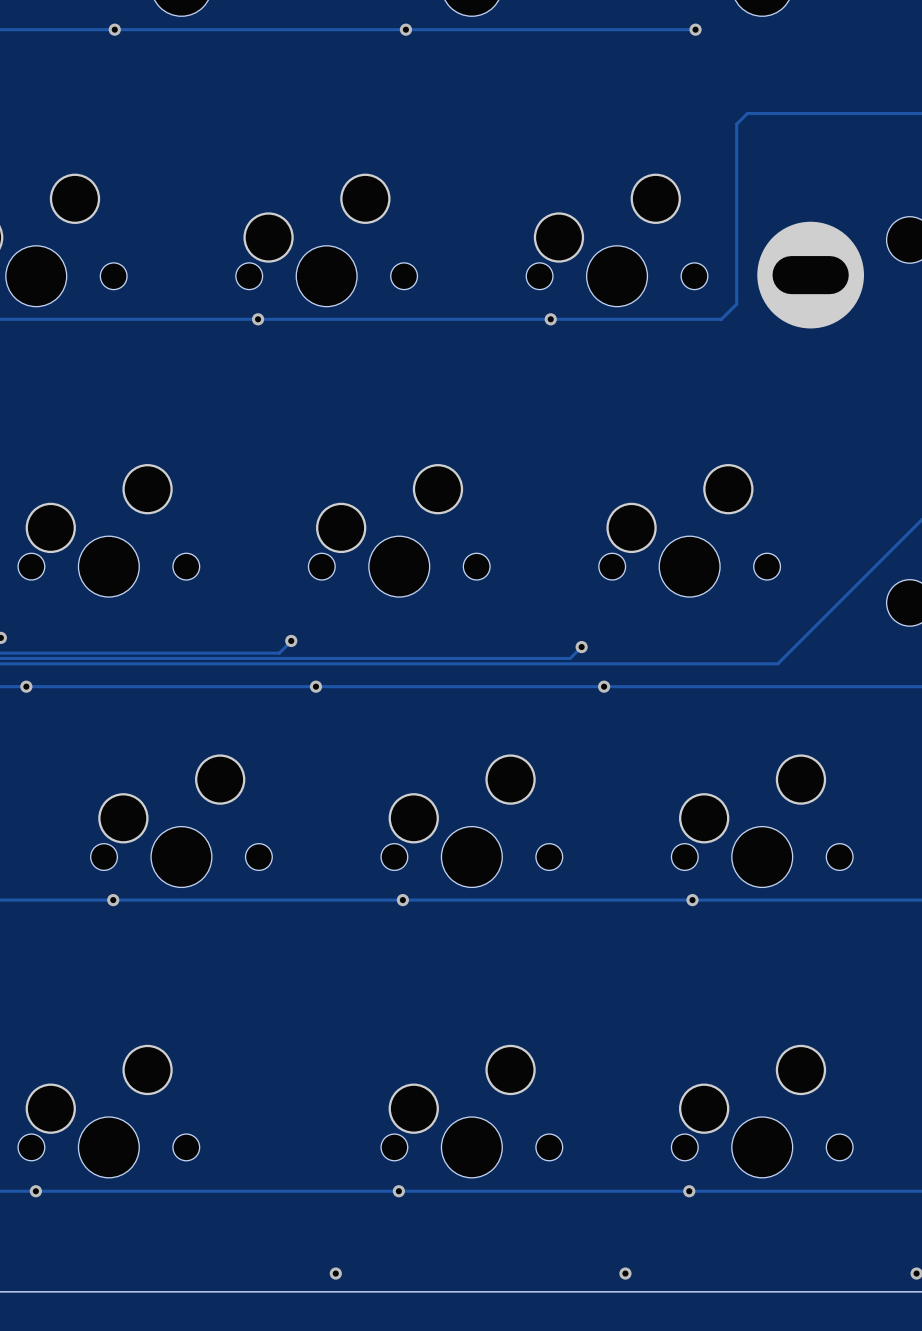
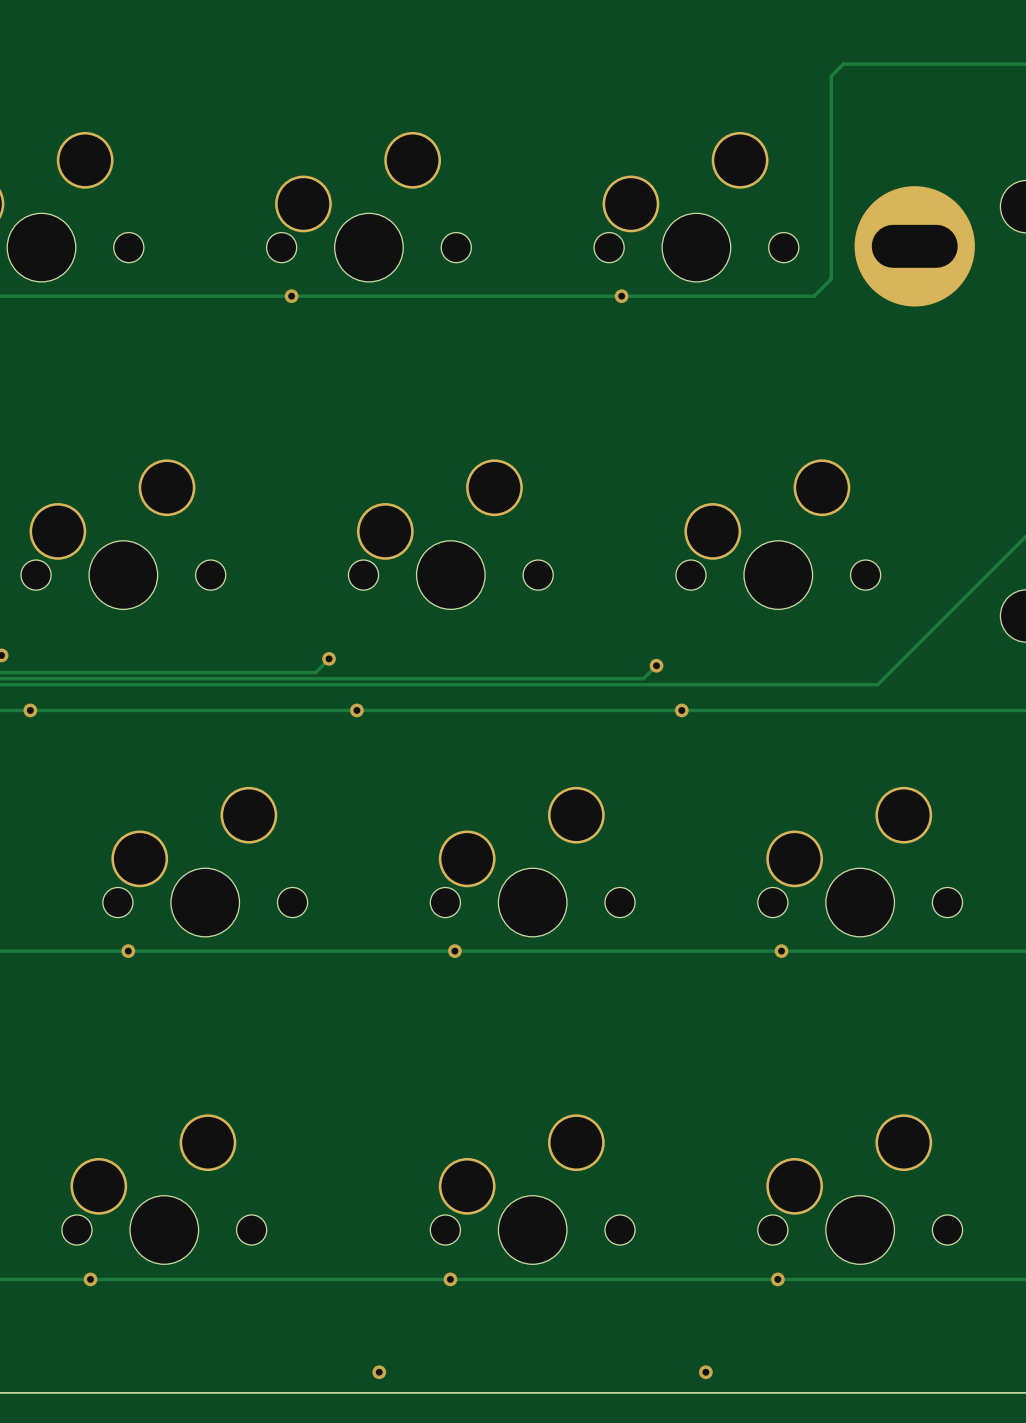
part position: (108, 1111) -> (164, 1189)
via position: (35, 1191) -> (90, 1279)

